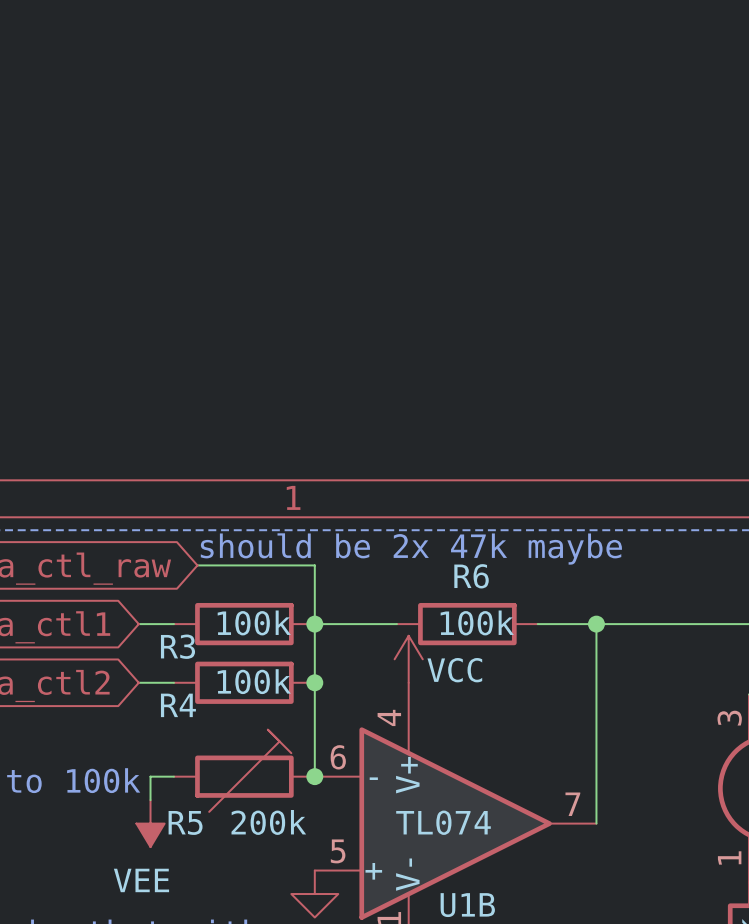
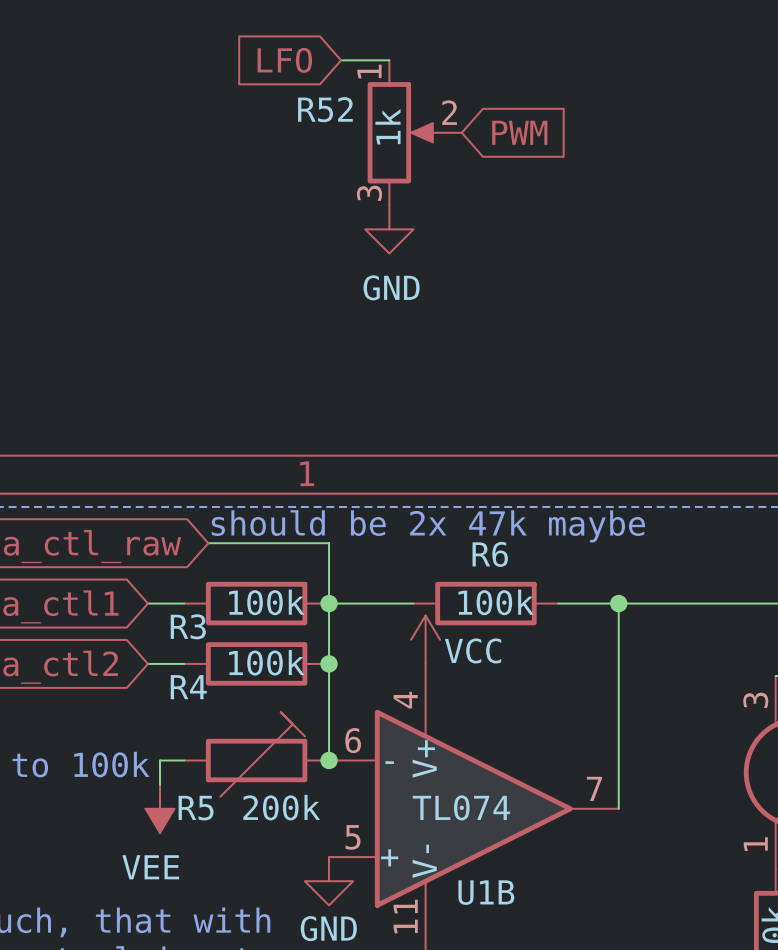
global label: none -> LFO (284, 60)
wire: none -> (341, 60) (389, 60)
R52: none -> 1k (414, 132)
global label: none -> PWM (519, 132)
power symbol: none -> GND (389, 229)

